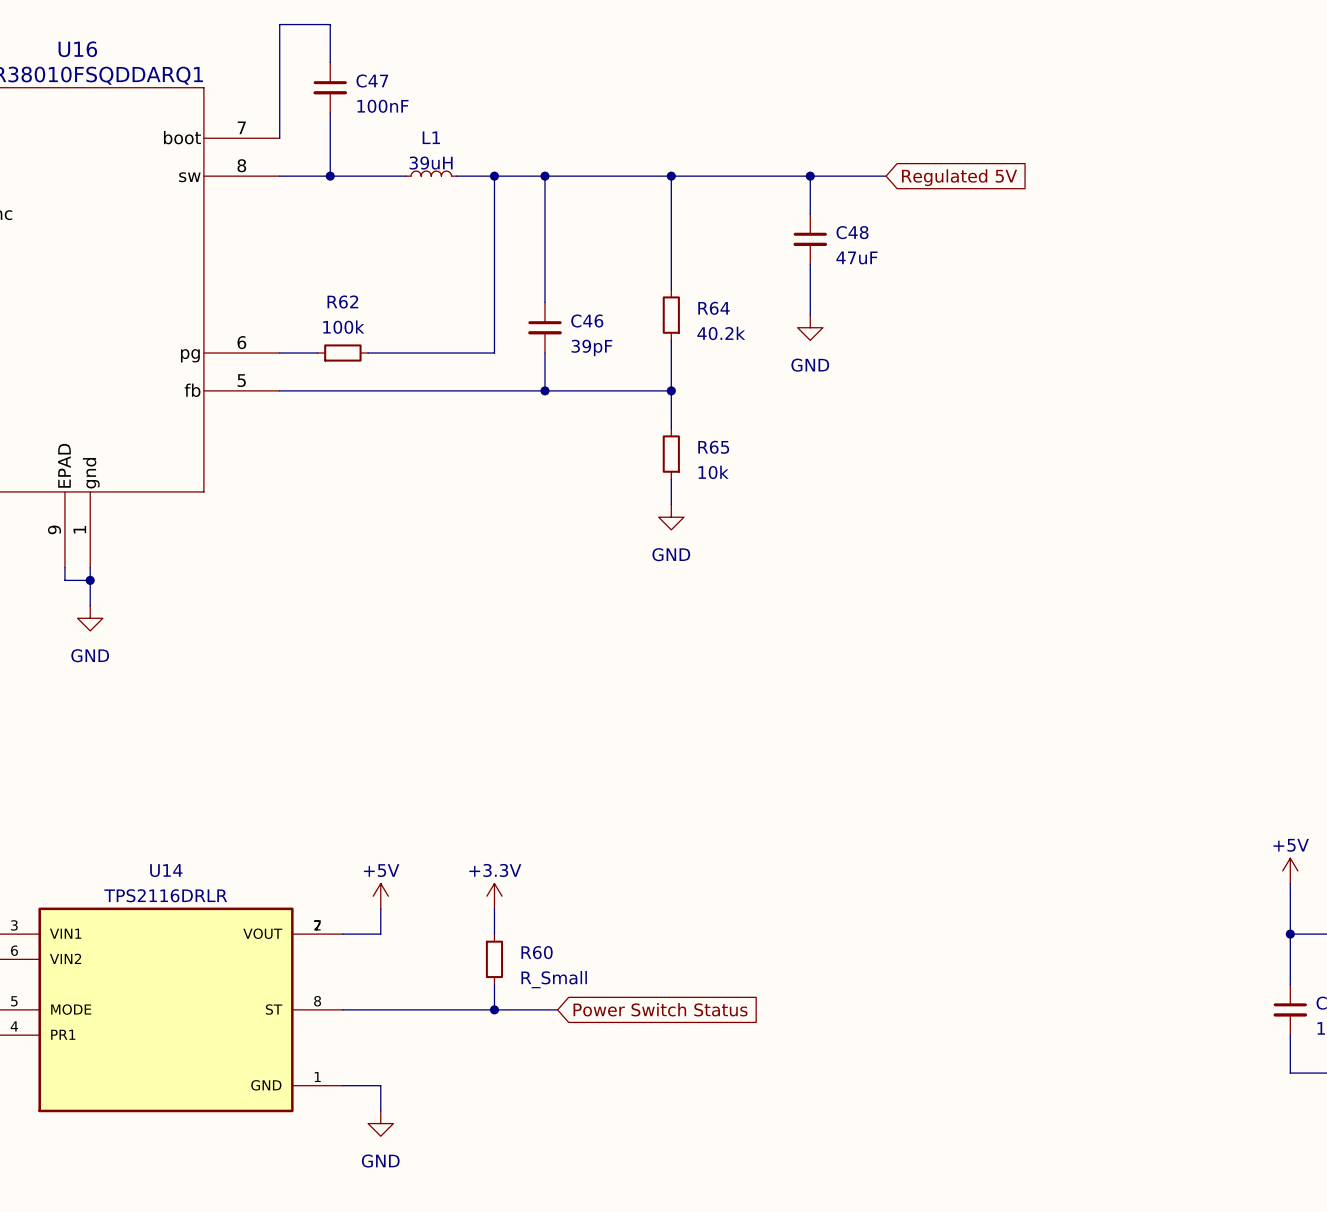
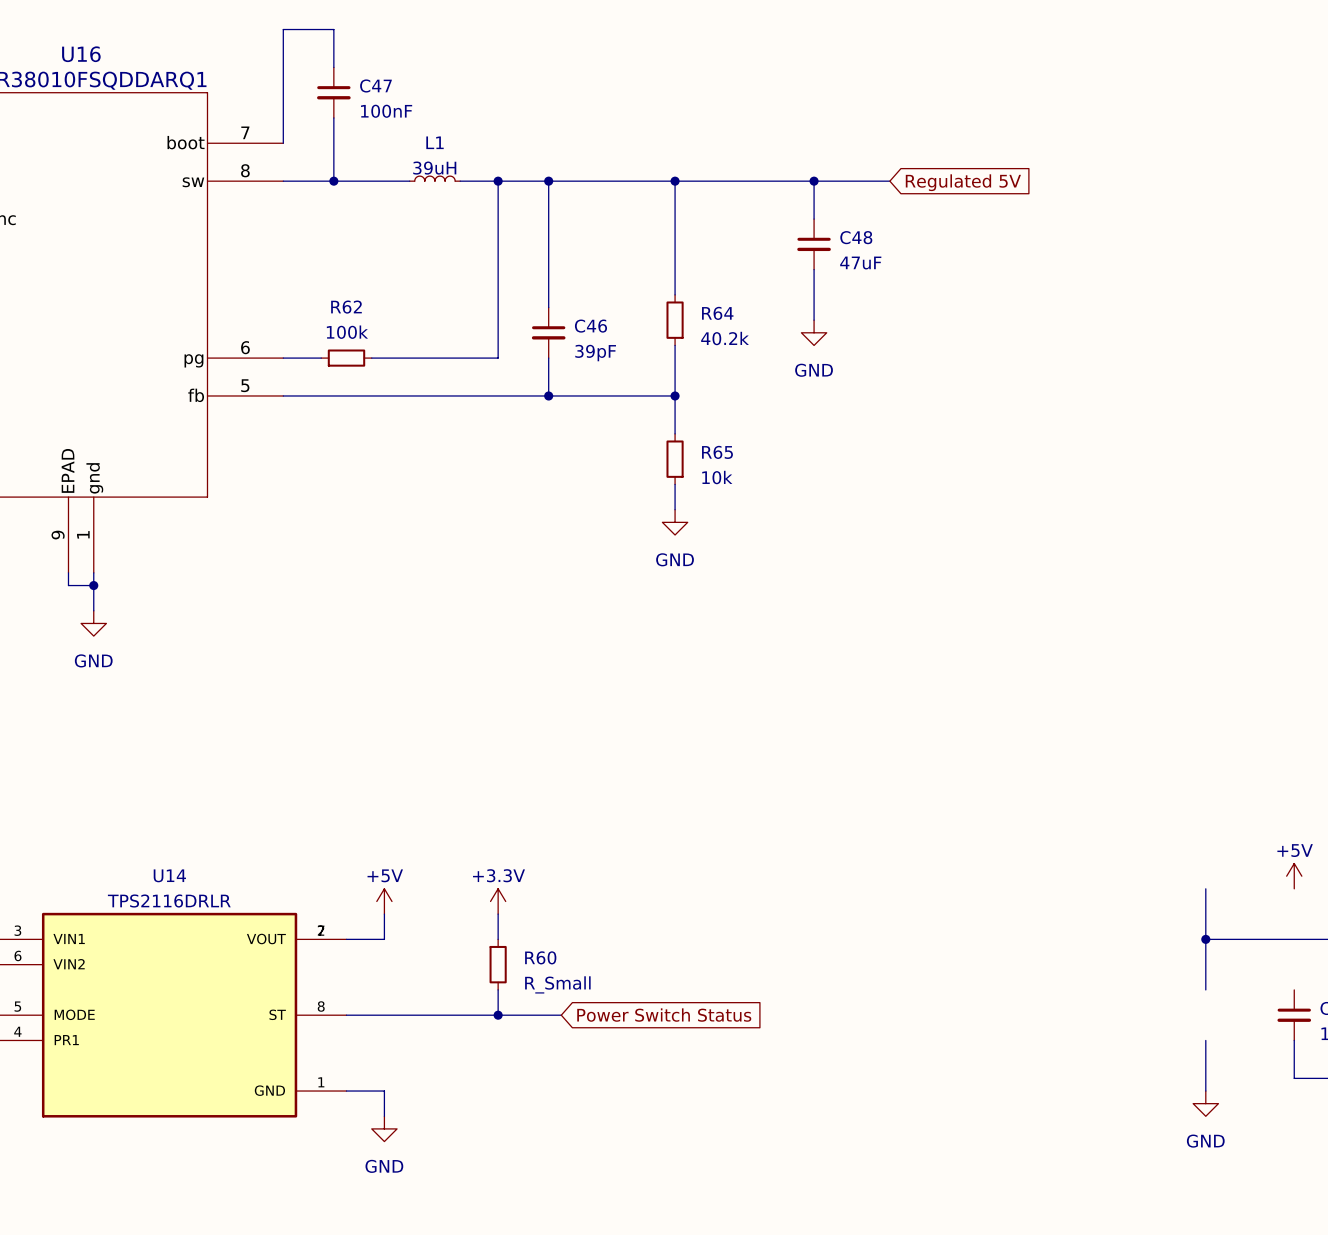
wire: (1290, 883) (1290, 984) -> (1205, 888) (1205, 989)
wire: none -> (1205, 939) (1294, 939)
junction: none -> (1205, 939)
junction: (1290, 934) -> none
wire: none -> (1205, 1040) (1205, 1091)
power symbol: none -> GND (1205, 1103)

